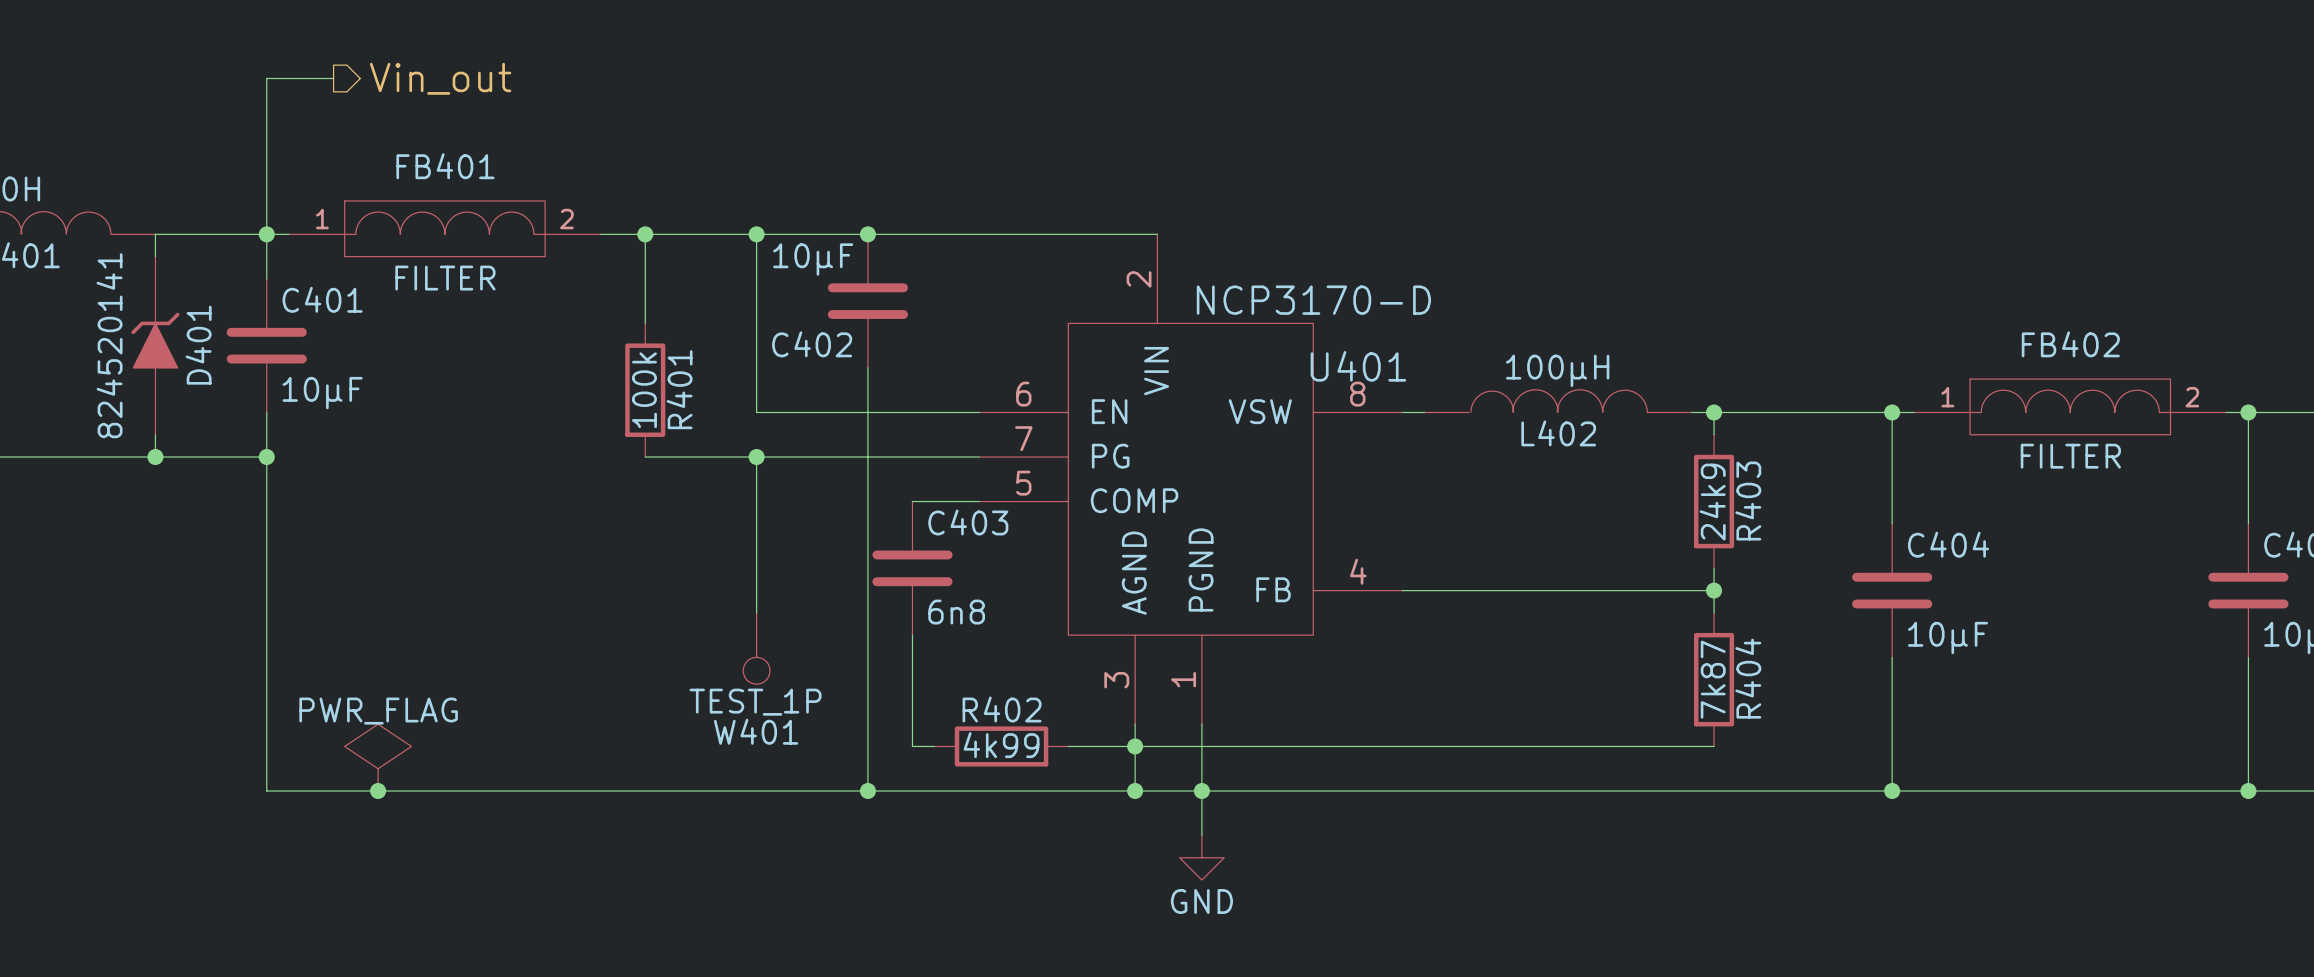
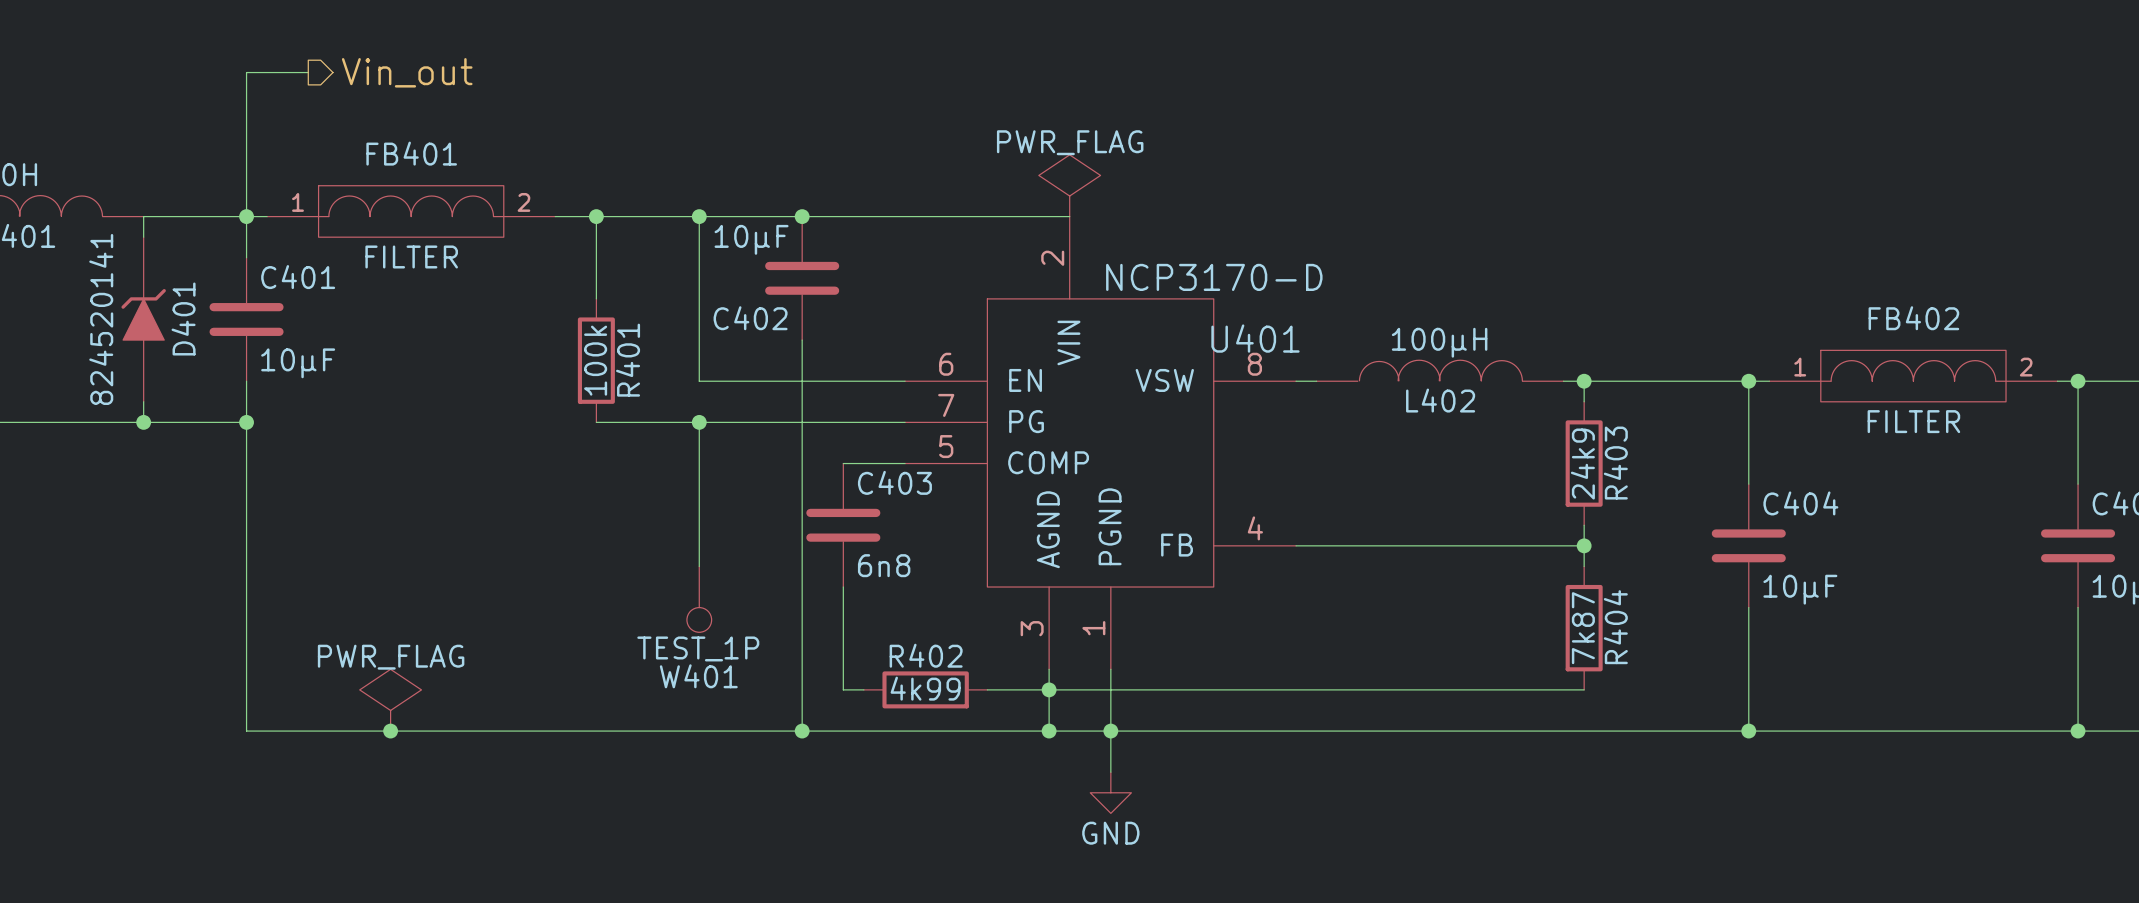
power symbol: none -> PWR_FLAG (1069, 185)
power symbol position: PWR_FLAG (378, 757) -> PWR_FLAG (390, 700)
junction position: (378, 791) -> (390, 731)

